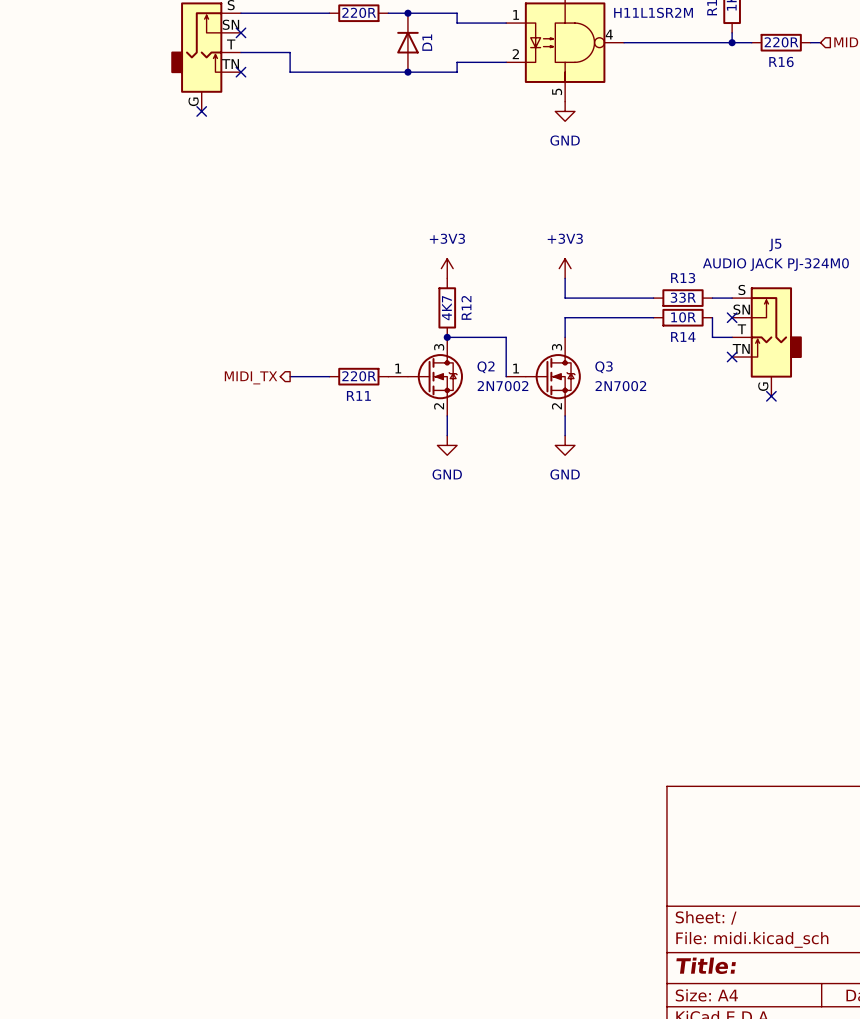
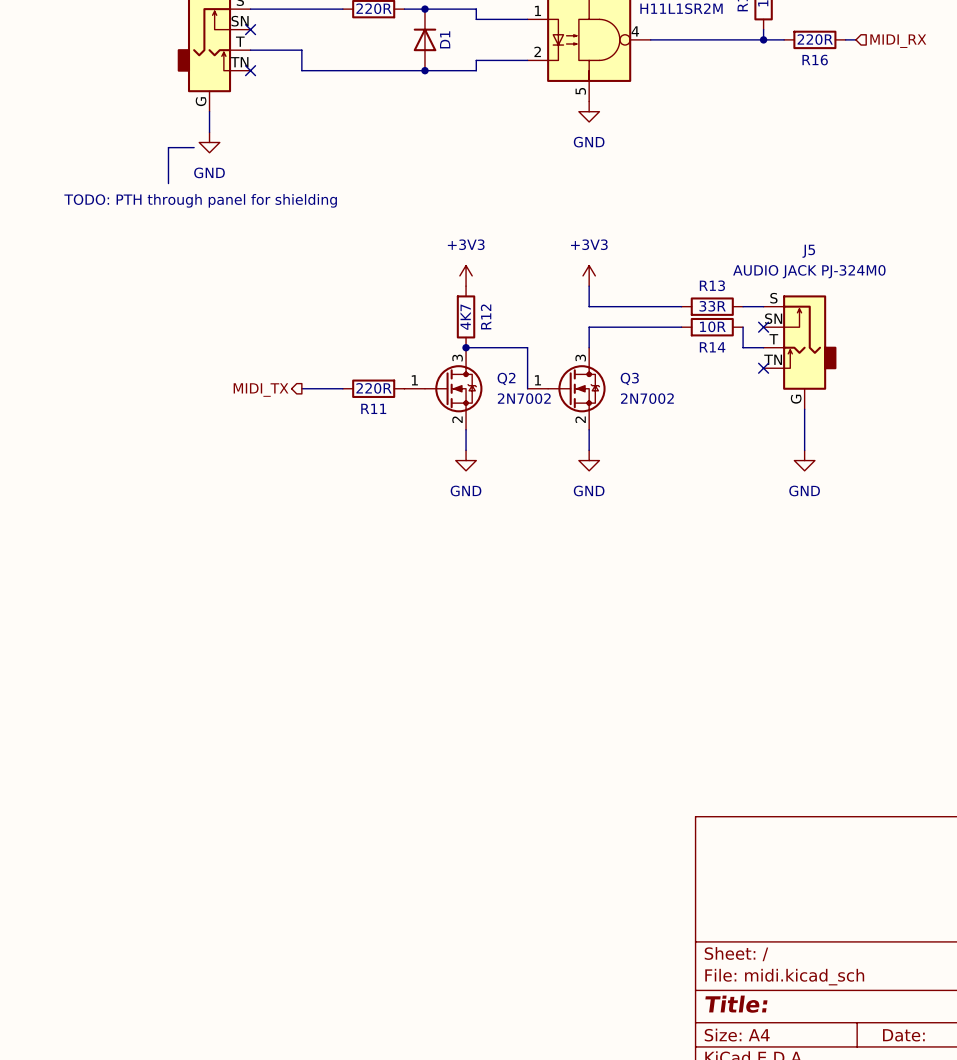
wire: none -> (209, 111) (209, 132)
no-connect mark: (201, 111) -> none
power symbol: none -> GND (209, 142)
line: none -> (194, 147) (168, 147) (168, 183)
text: none -> TODO: PTH through panel for shielding (200, 200)
wire: none -> (804, 409) (804, 450)
no-connect mark: (771, 396) -> none
power symbol: none -> GND (804, 460)

